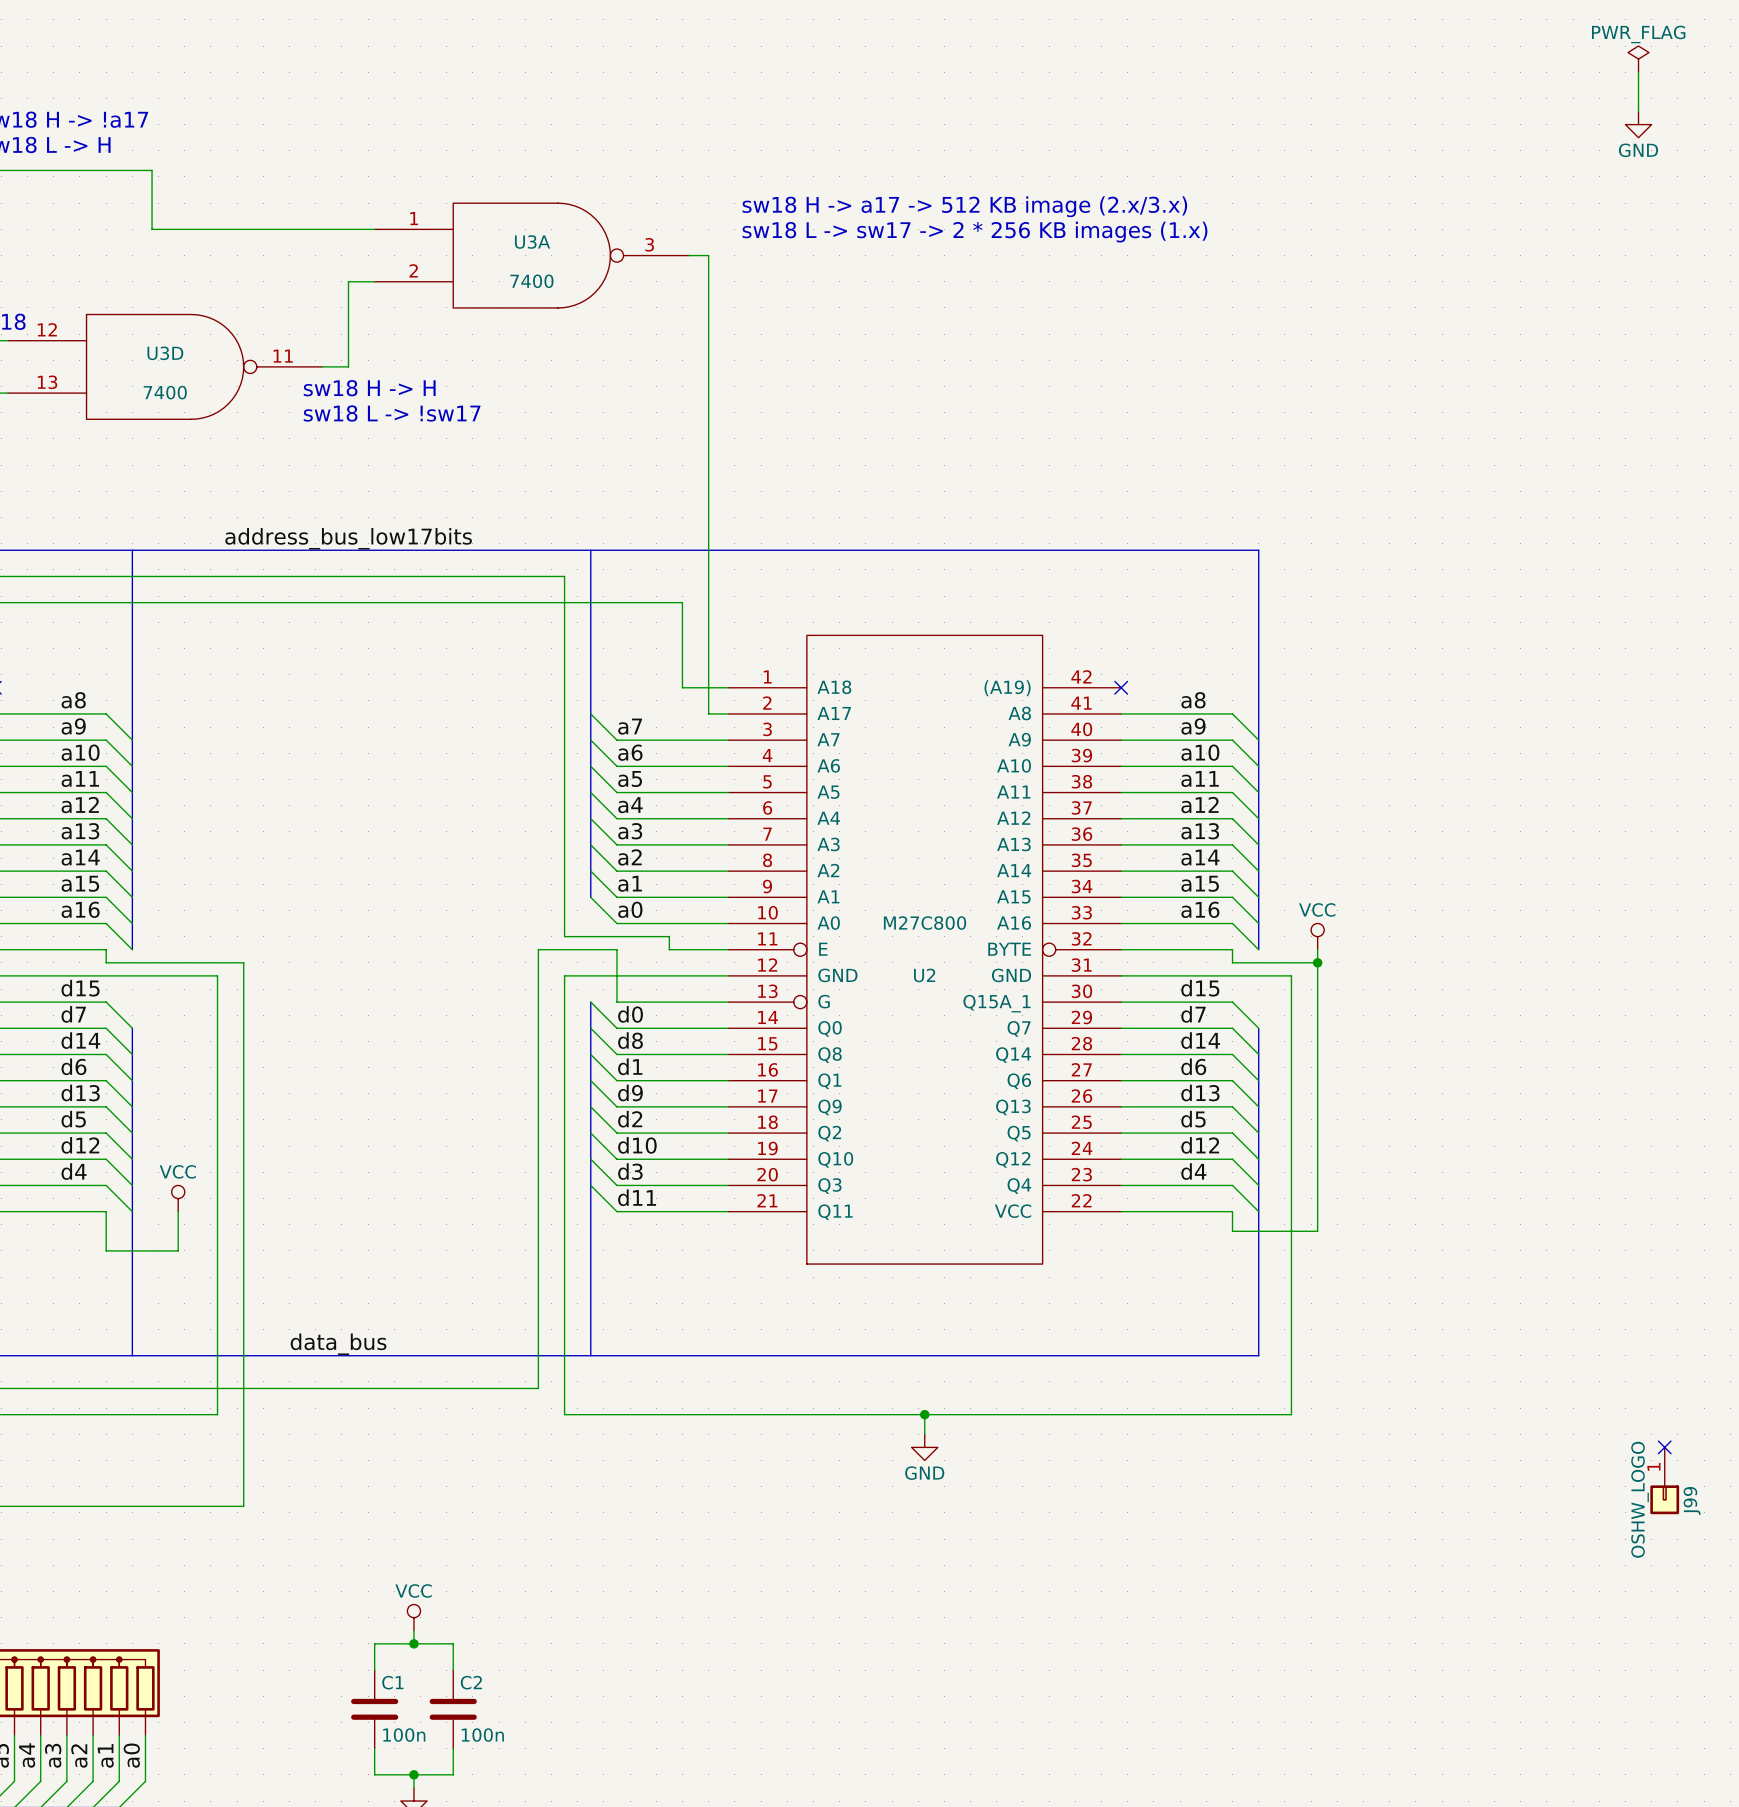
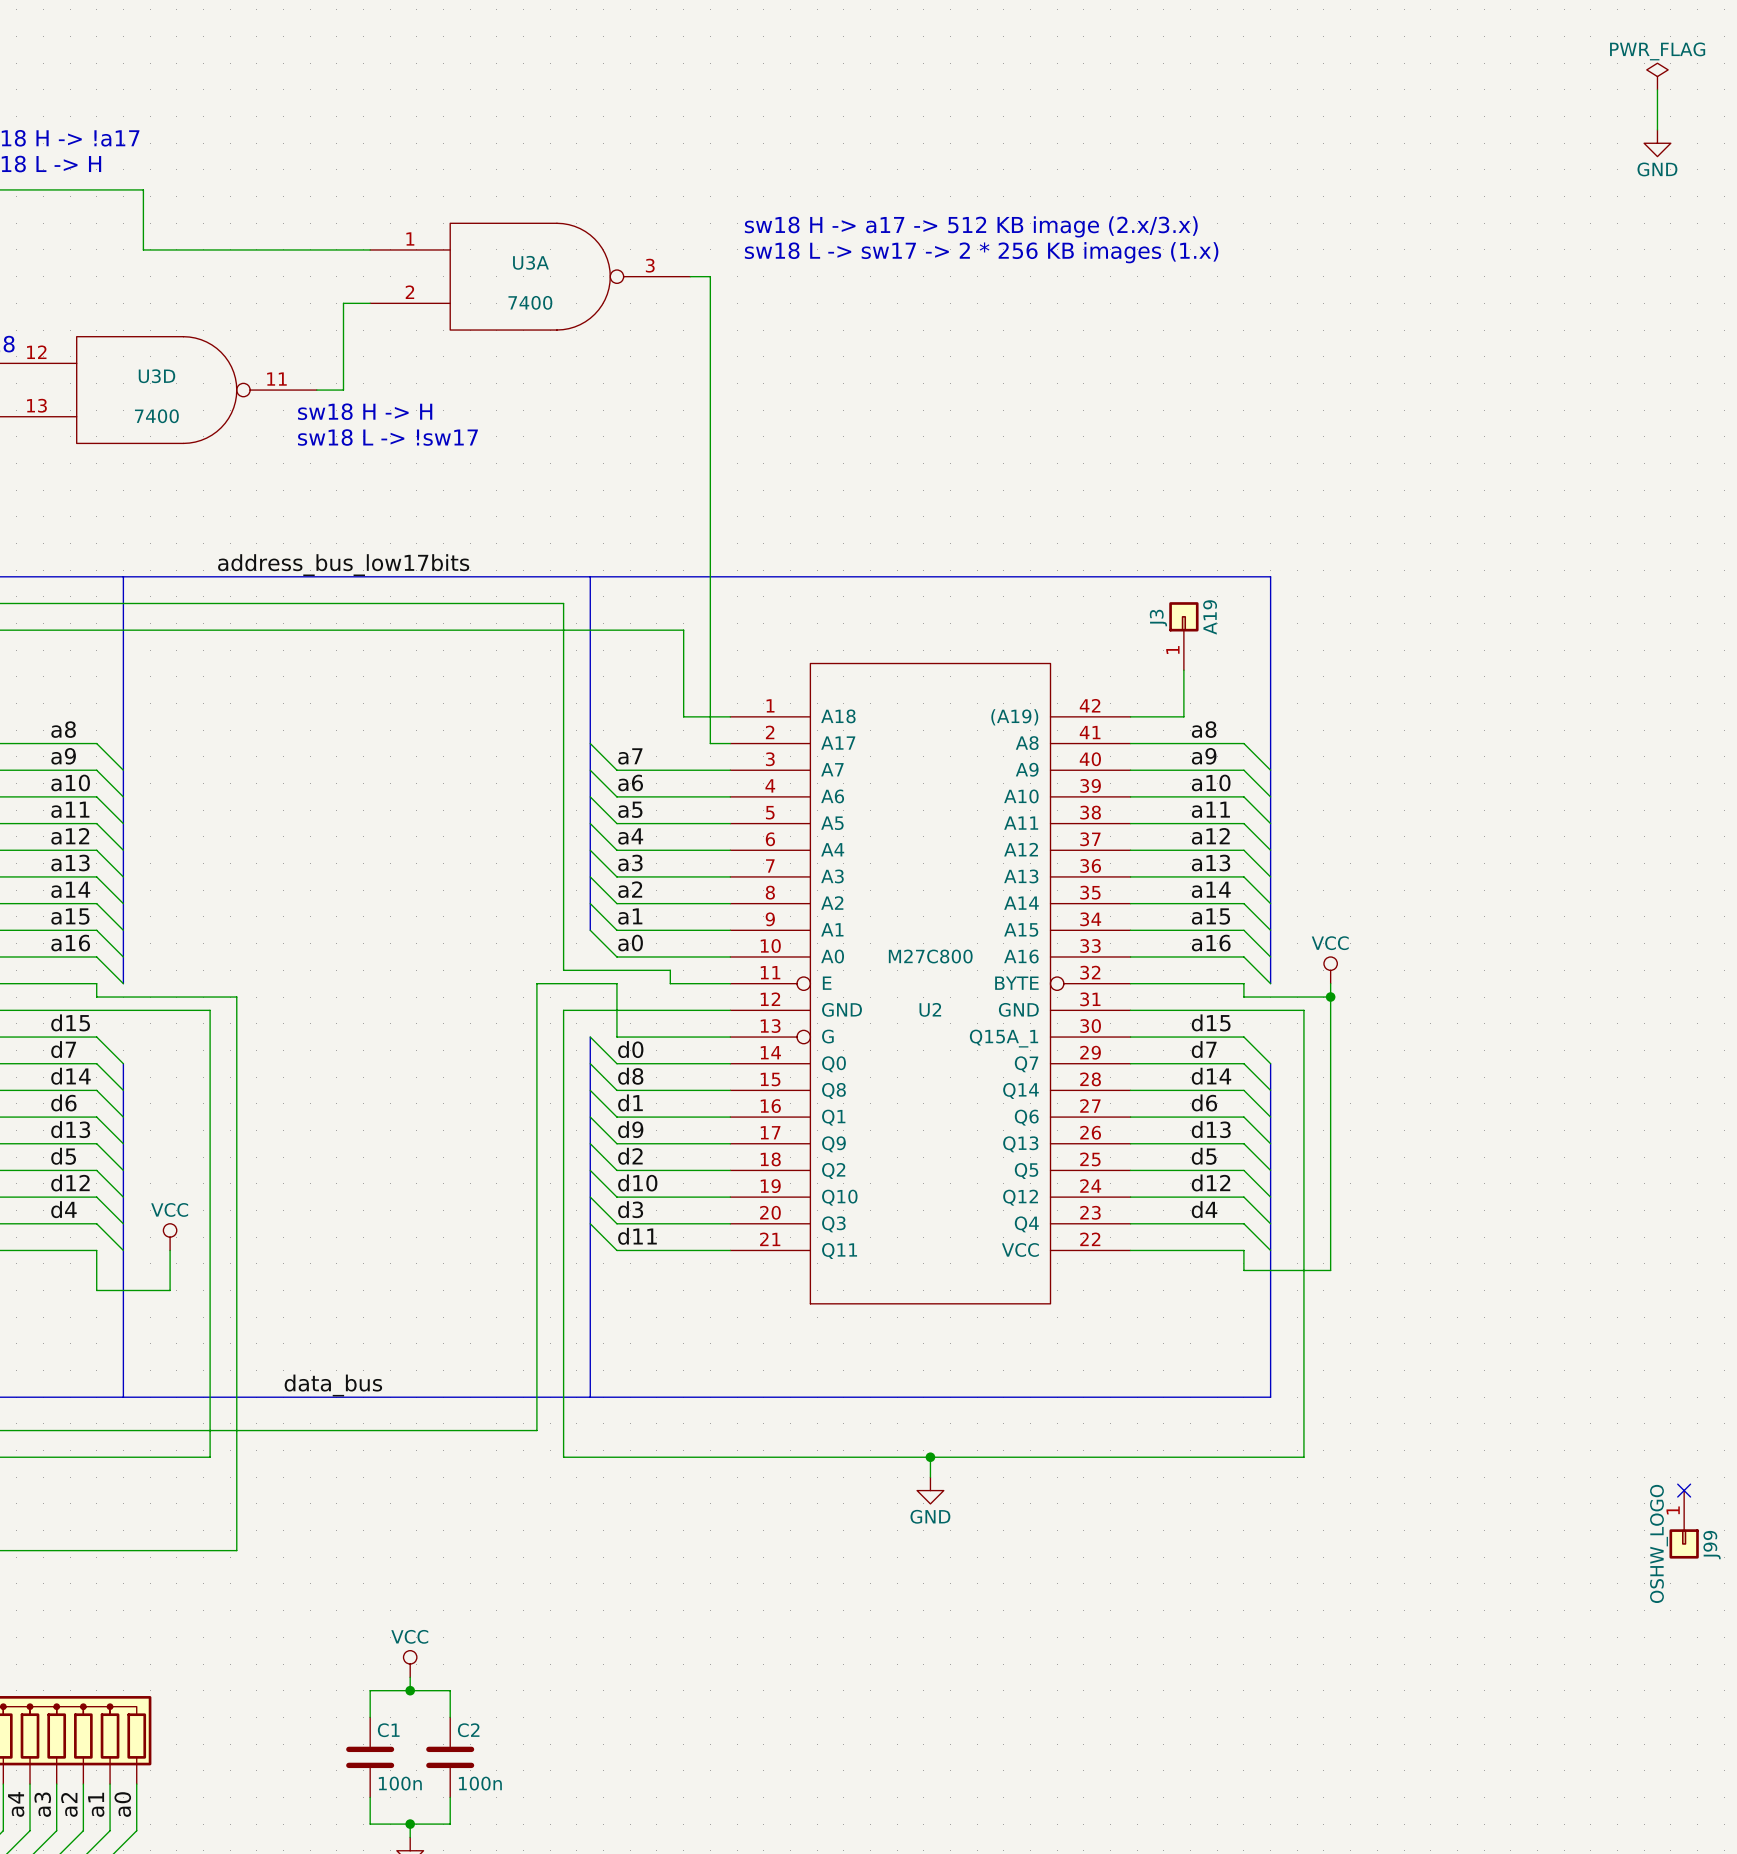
J3: none -> A19 (1183, 636)
wire: none -> (1183, 670) (1183, 716) (1130, 716)
no-connect mark: (1121, 687) -> none

